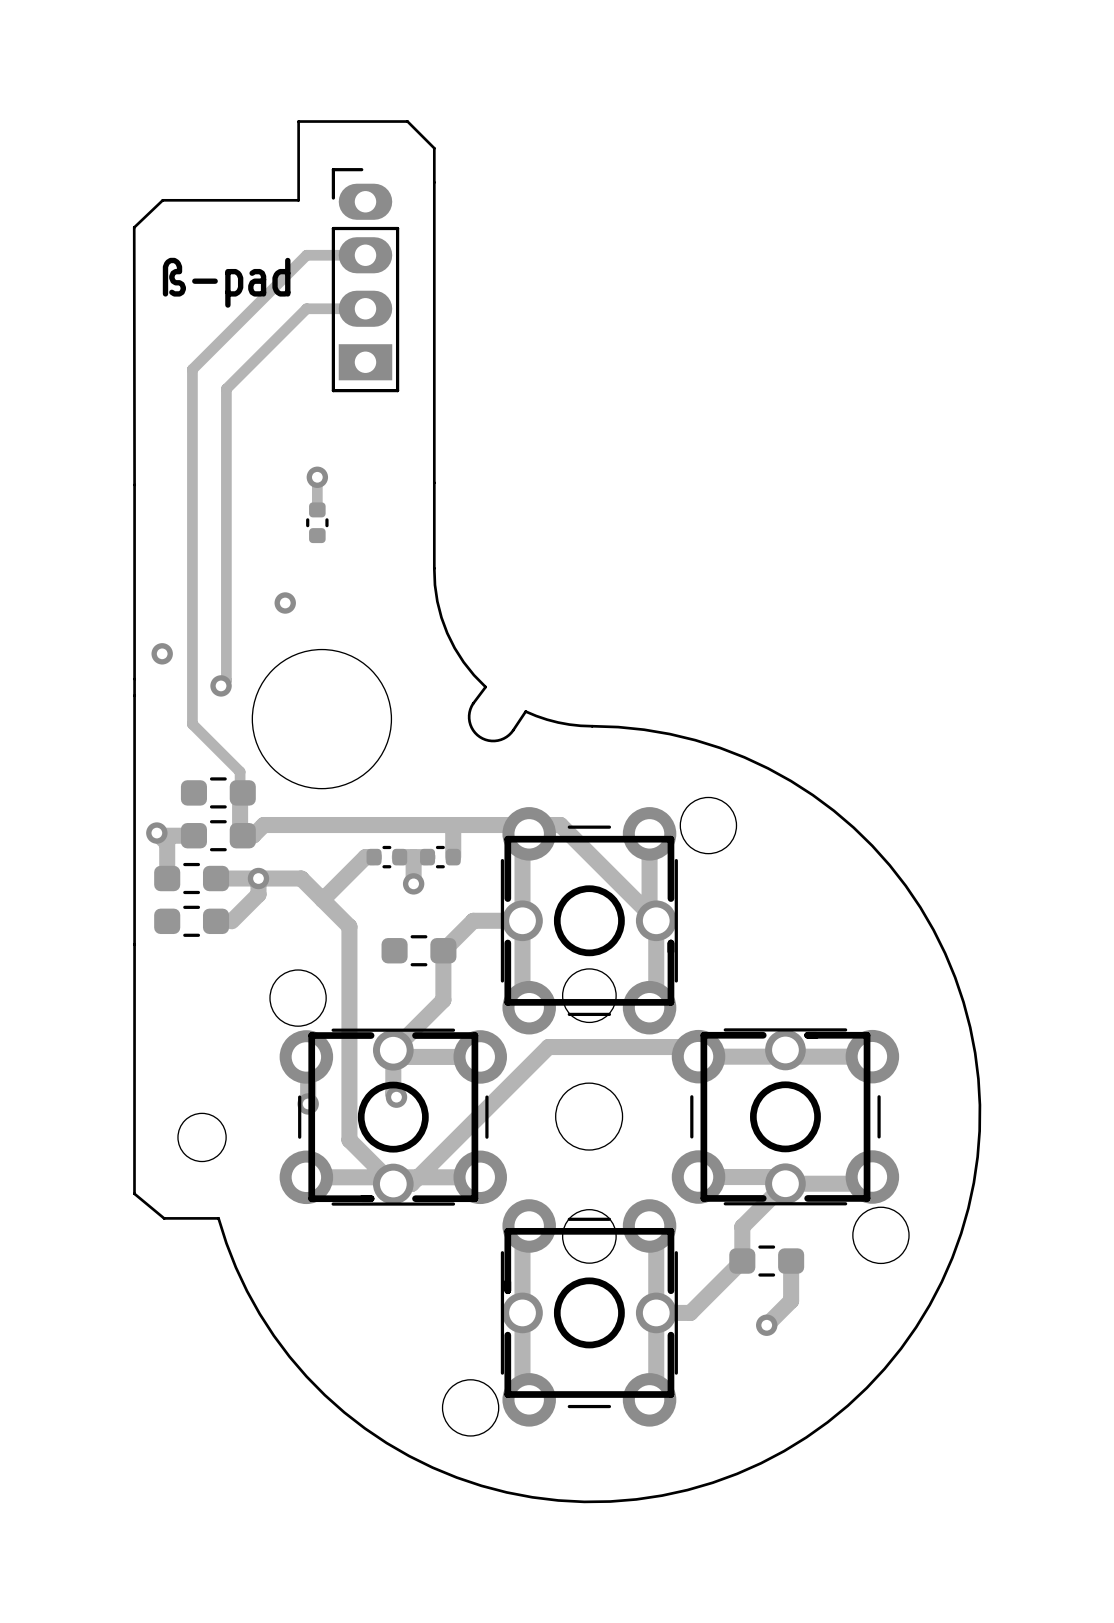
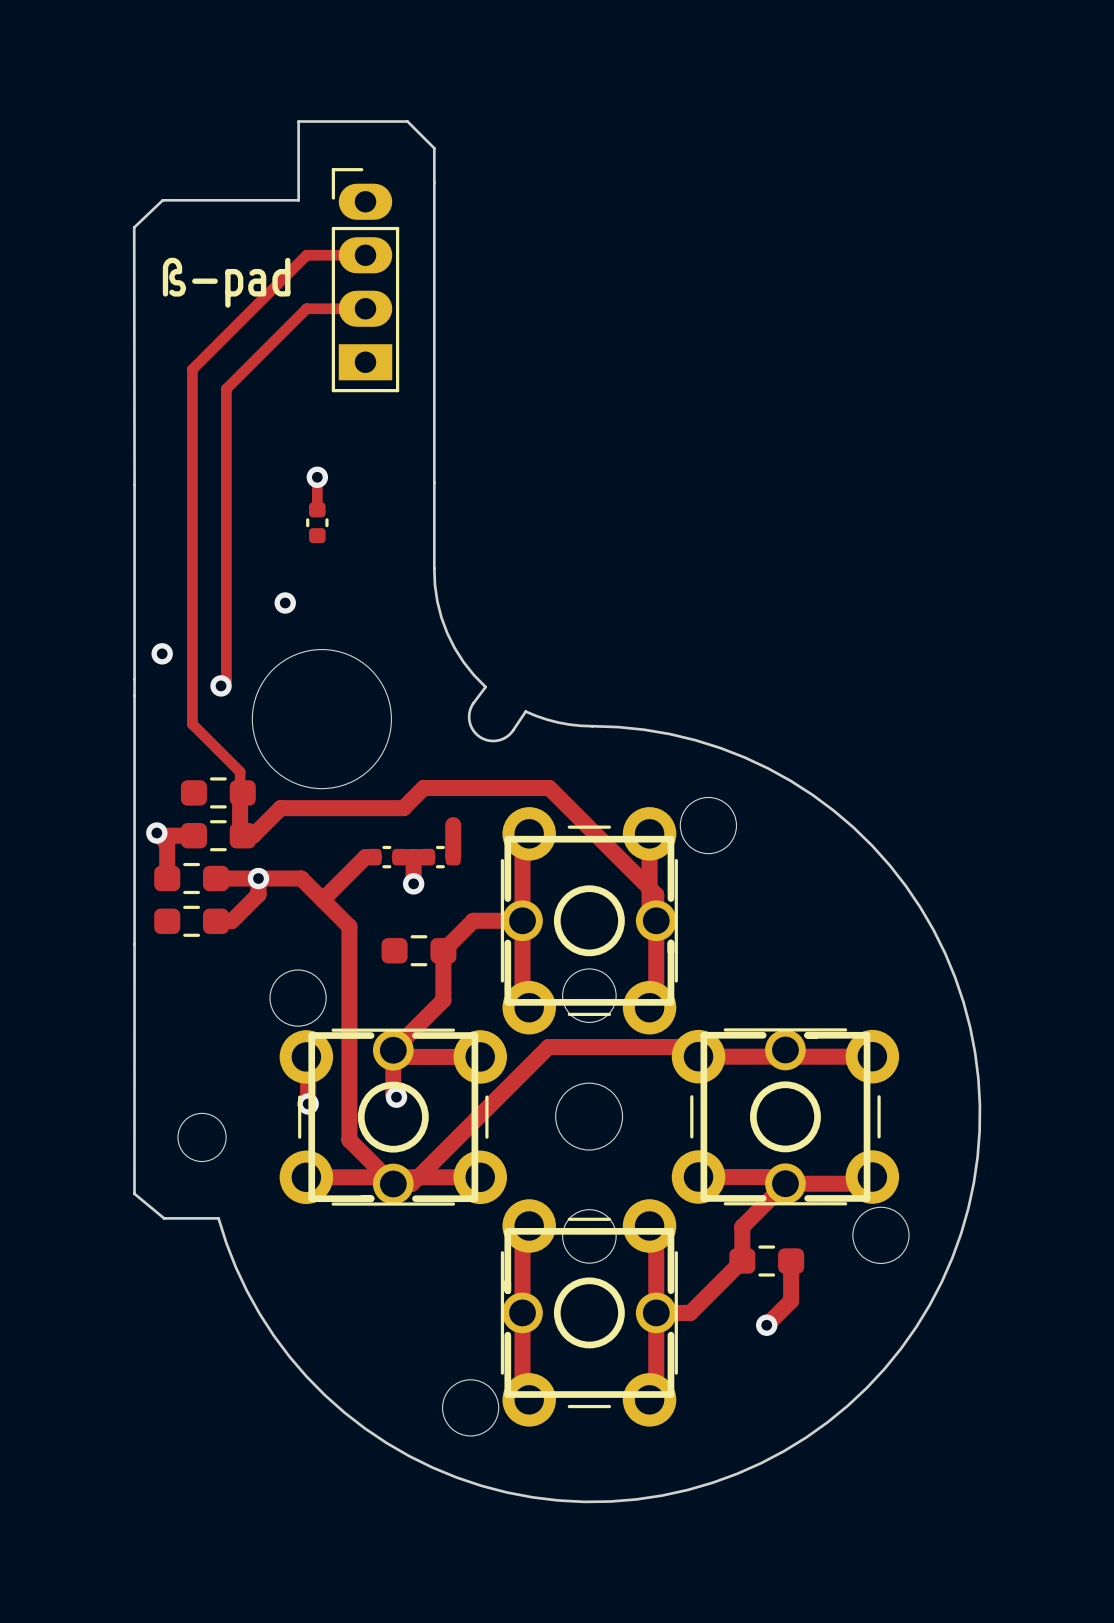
track: (263, 825) (560, 825) (649, 914) -> (263, 825) (280, 808) (403, 808) (423, 788) (549, 788) (656, 894) (656, 920)

